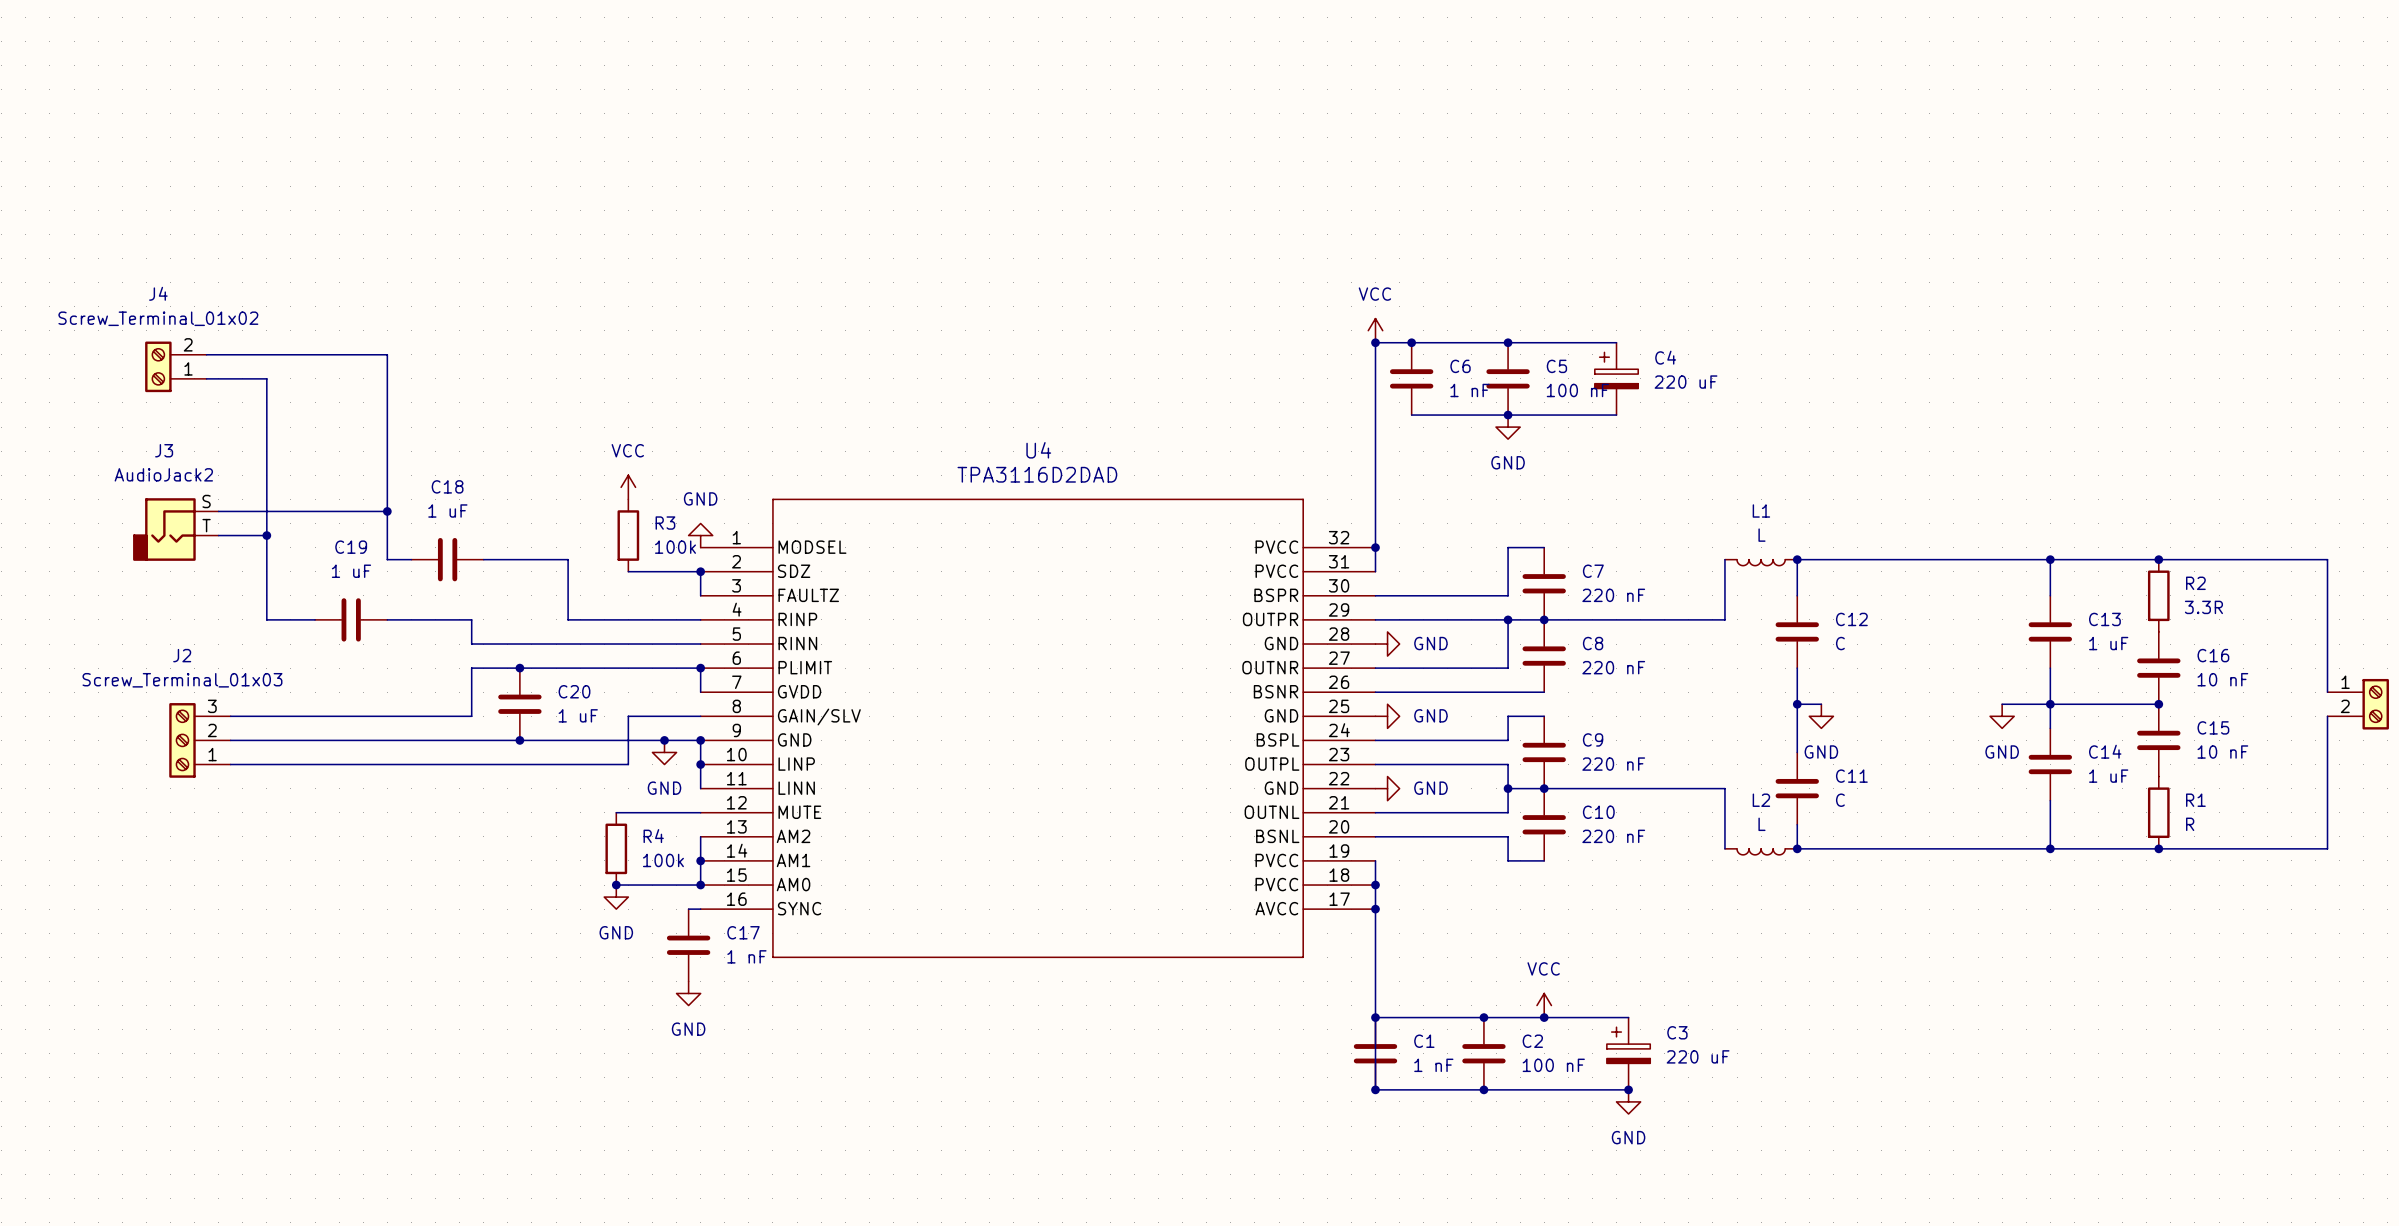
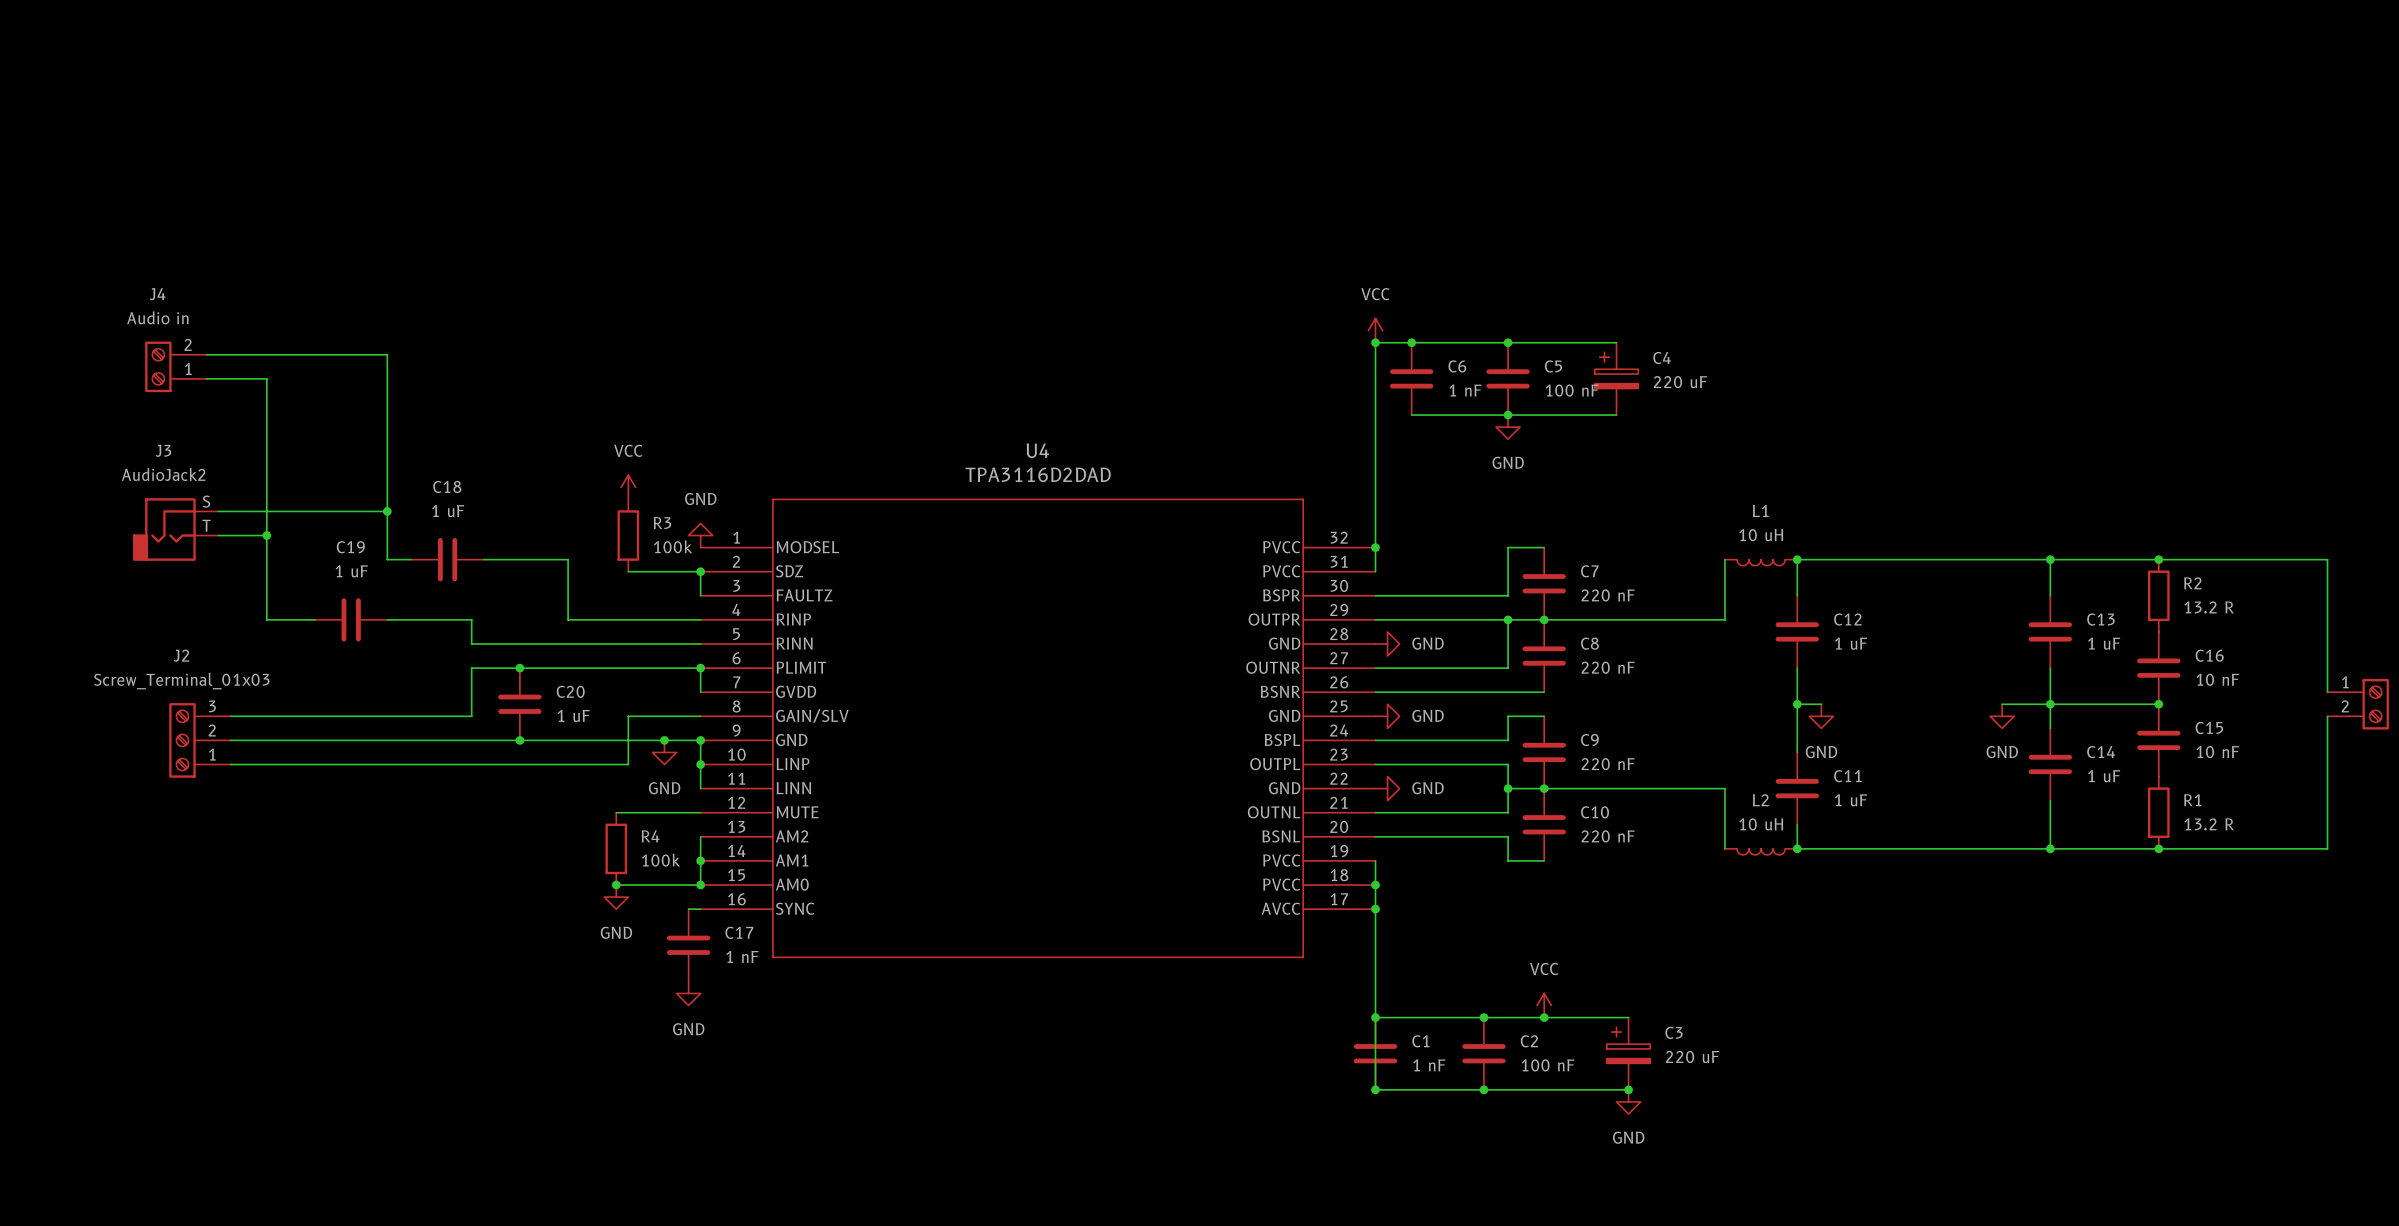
J4 value: Screw_Terminal_01x02 (158, 318) -> Audio in (157, 317)
L1 value: L (1761, 535) -> 10 uH (1761, 535)
R2 value: 3.3R (2203, 607) -> 13.2 R (2209, 607)
C12 value: C (1840, 643) -> 1 uF (1851, 643)
C11 value: C (1840, 800) -> 1 uF (1851, 800)
L2 value: L (1761, 824) -> 10 uH (1761, 824)
R1 value: R (2190, 824) -> 13.2 R (2209, 824)

